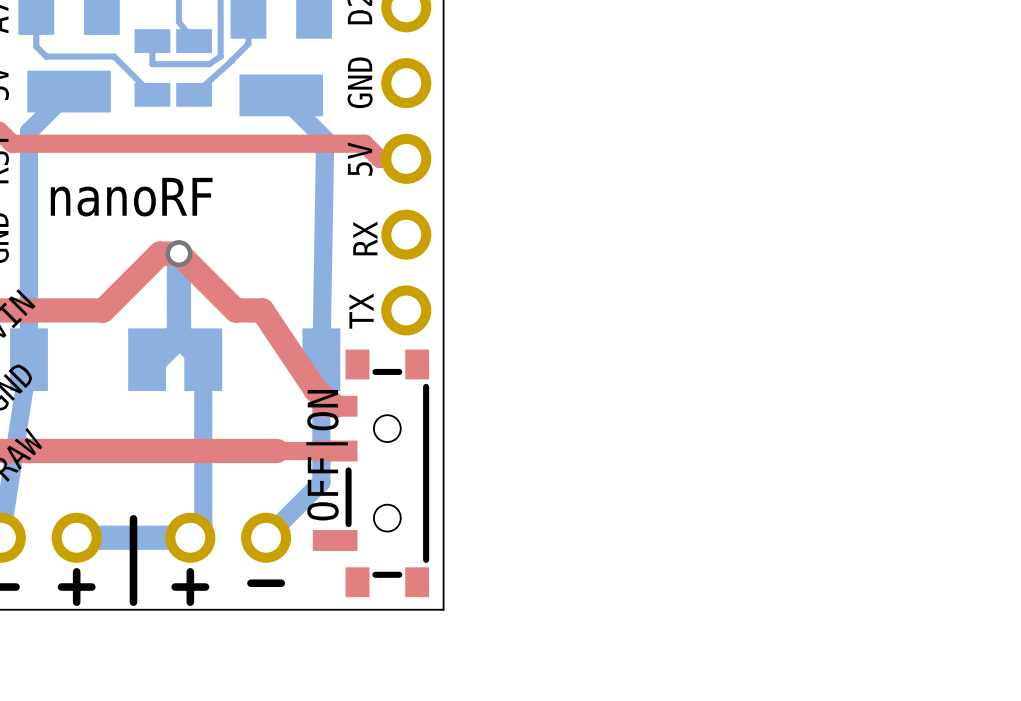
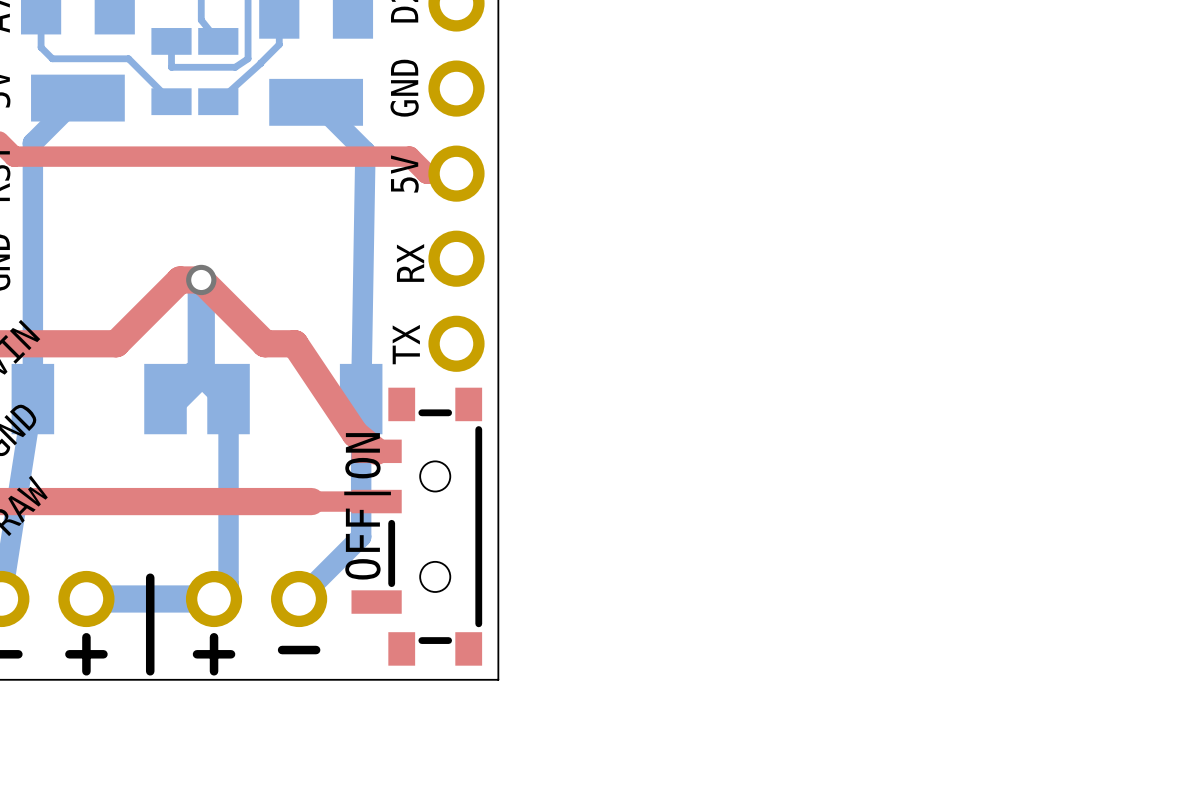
text: nanoRF (131, 197) -> none

